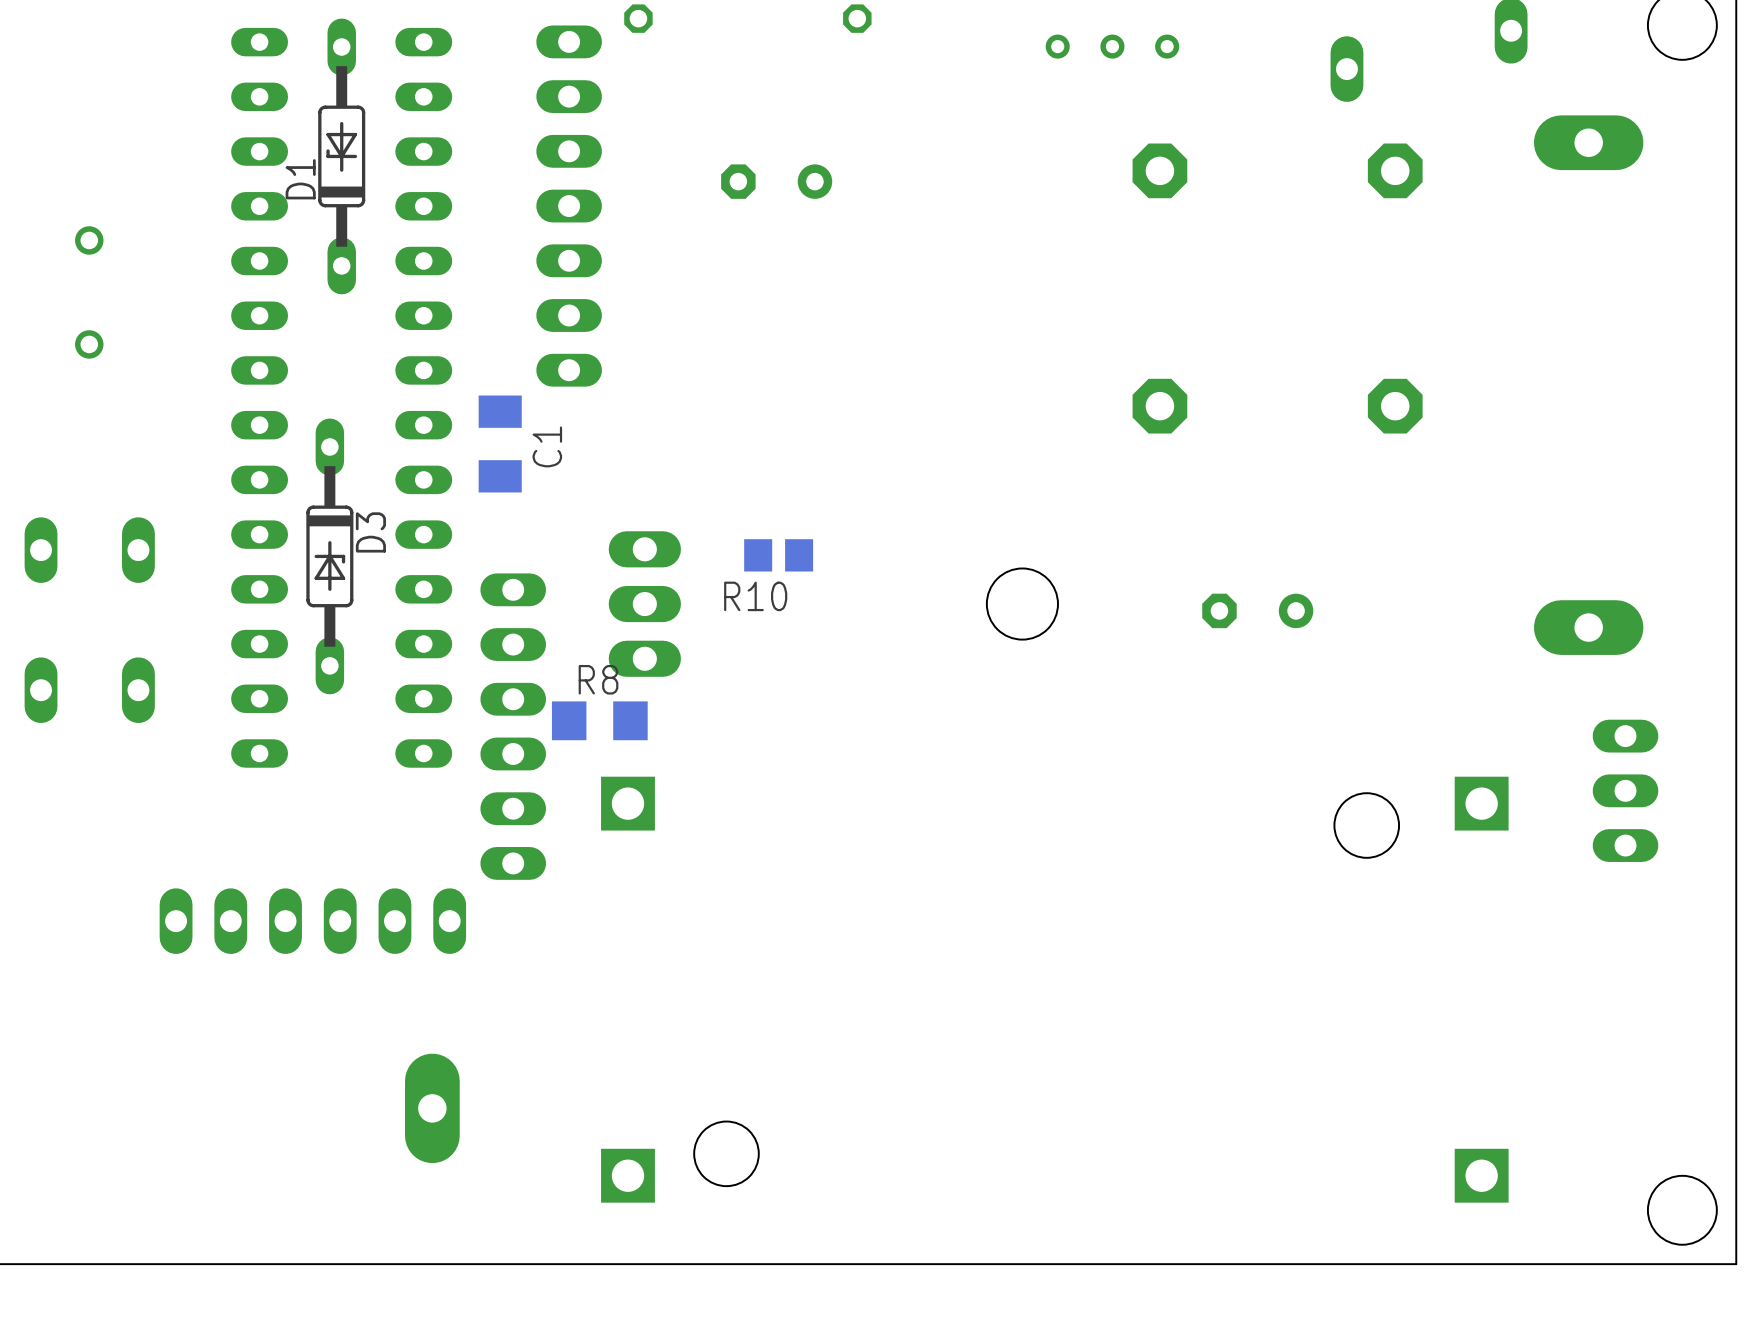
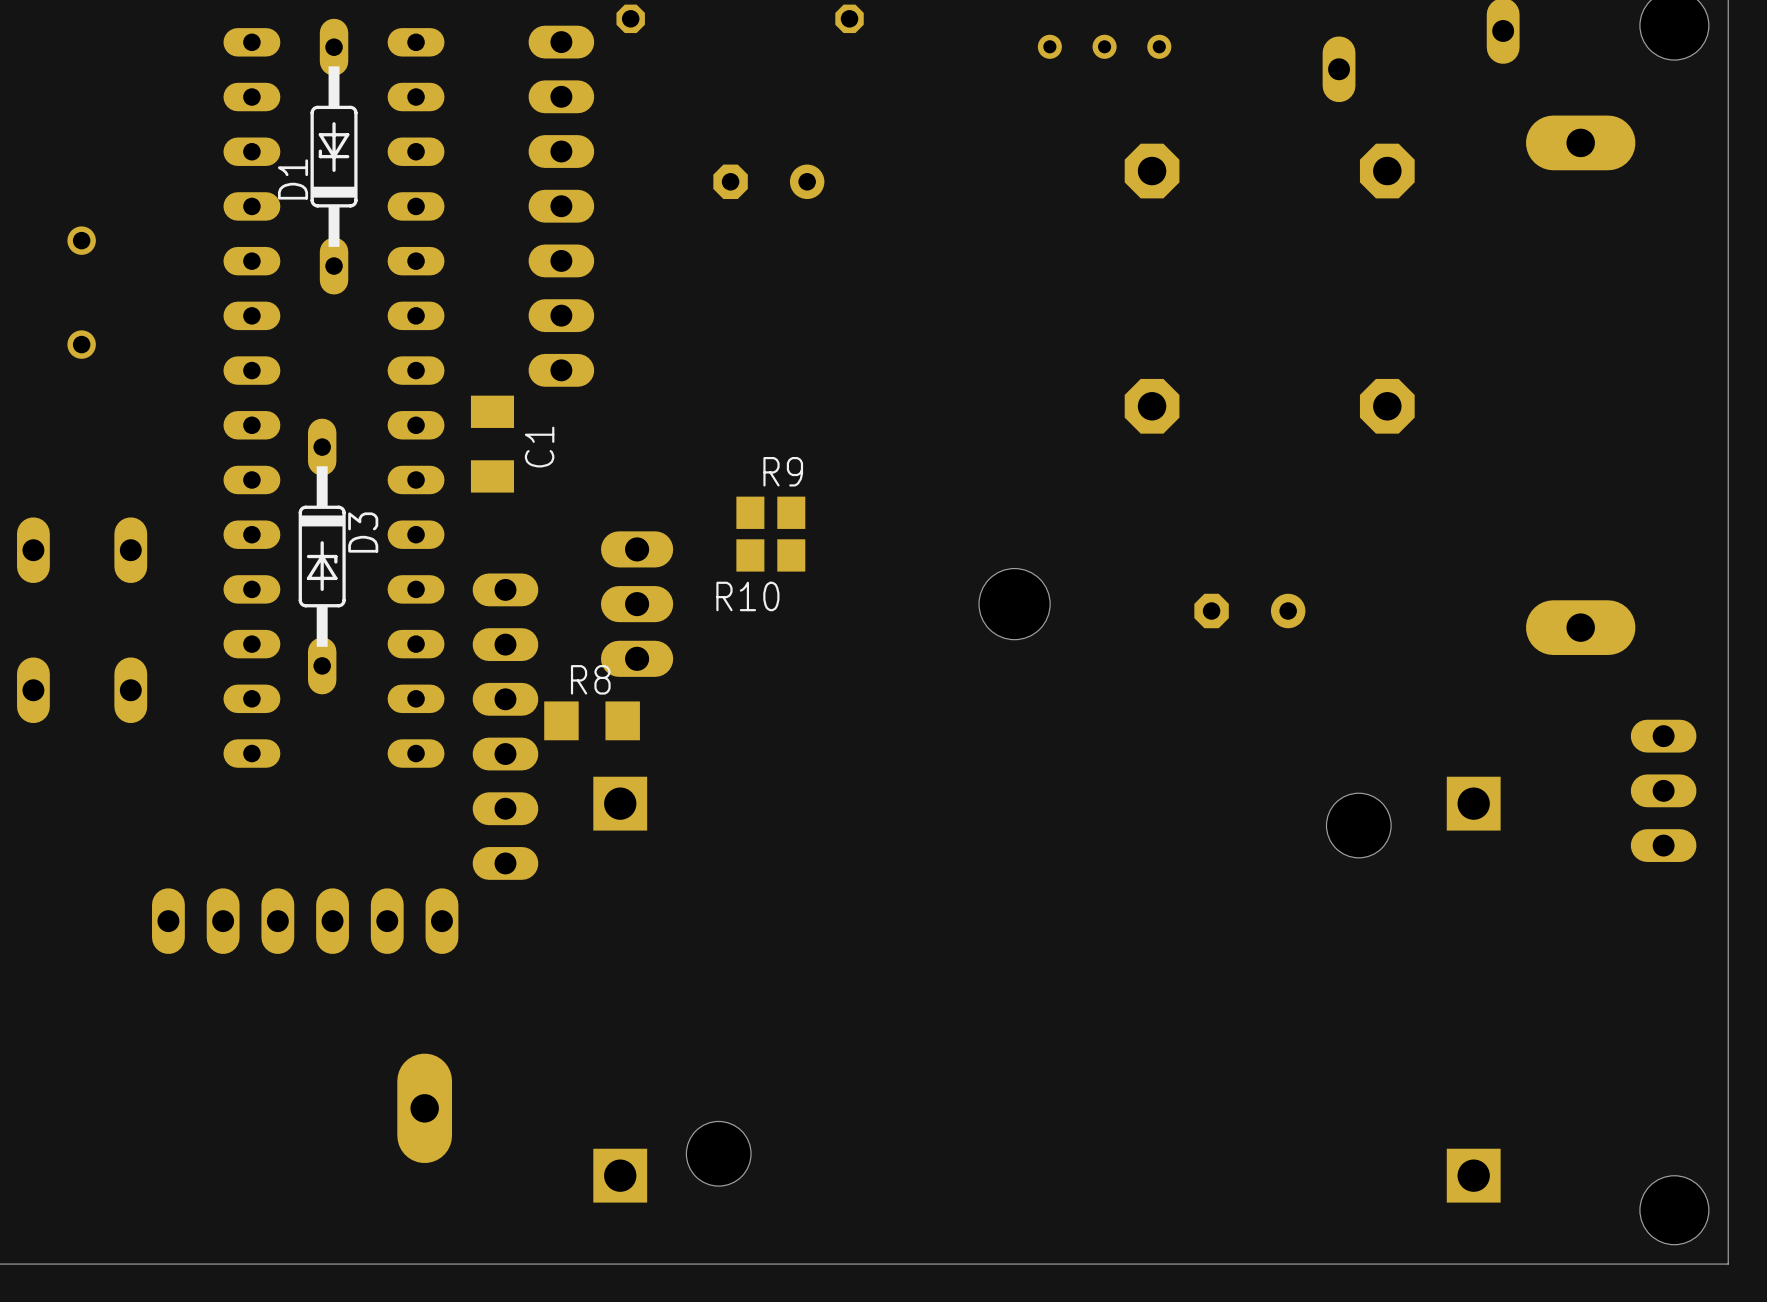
R9: none -> (770, 512)
part position: (1625, 790) -> (1663, 790)

